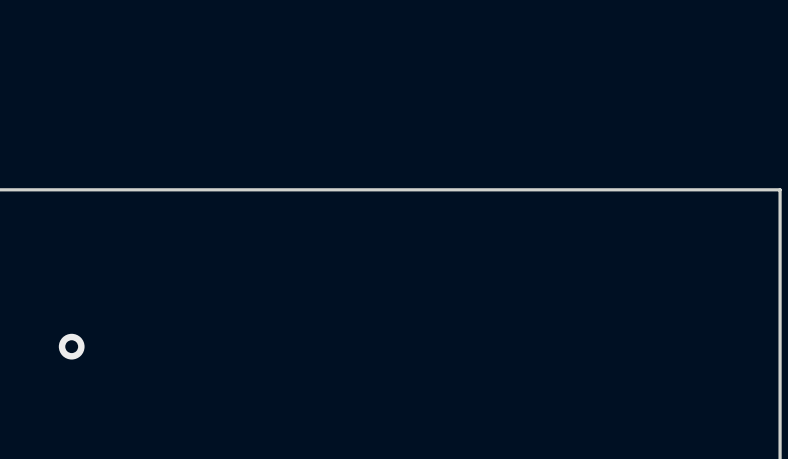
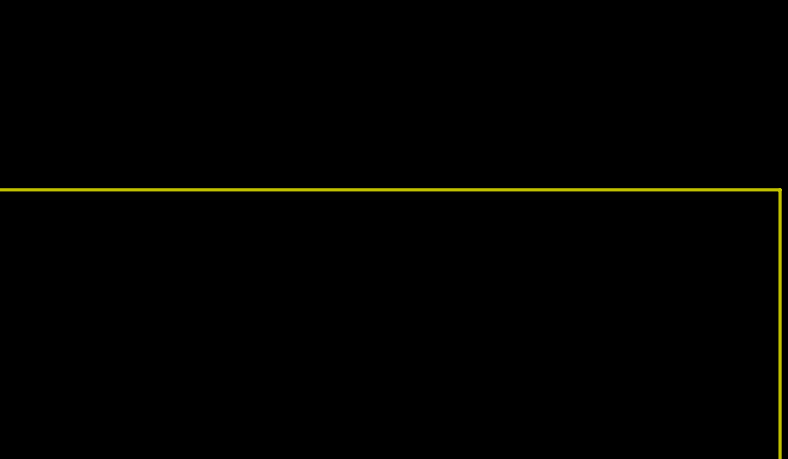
via: (71, 346) -> none

